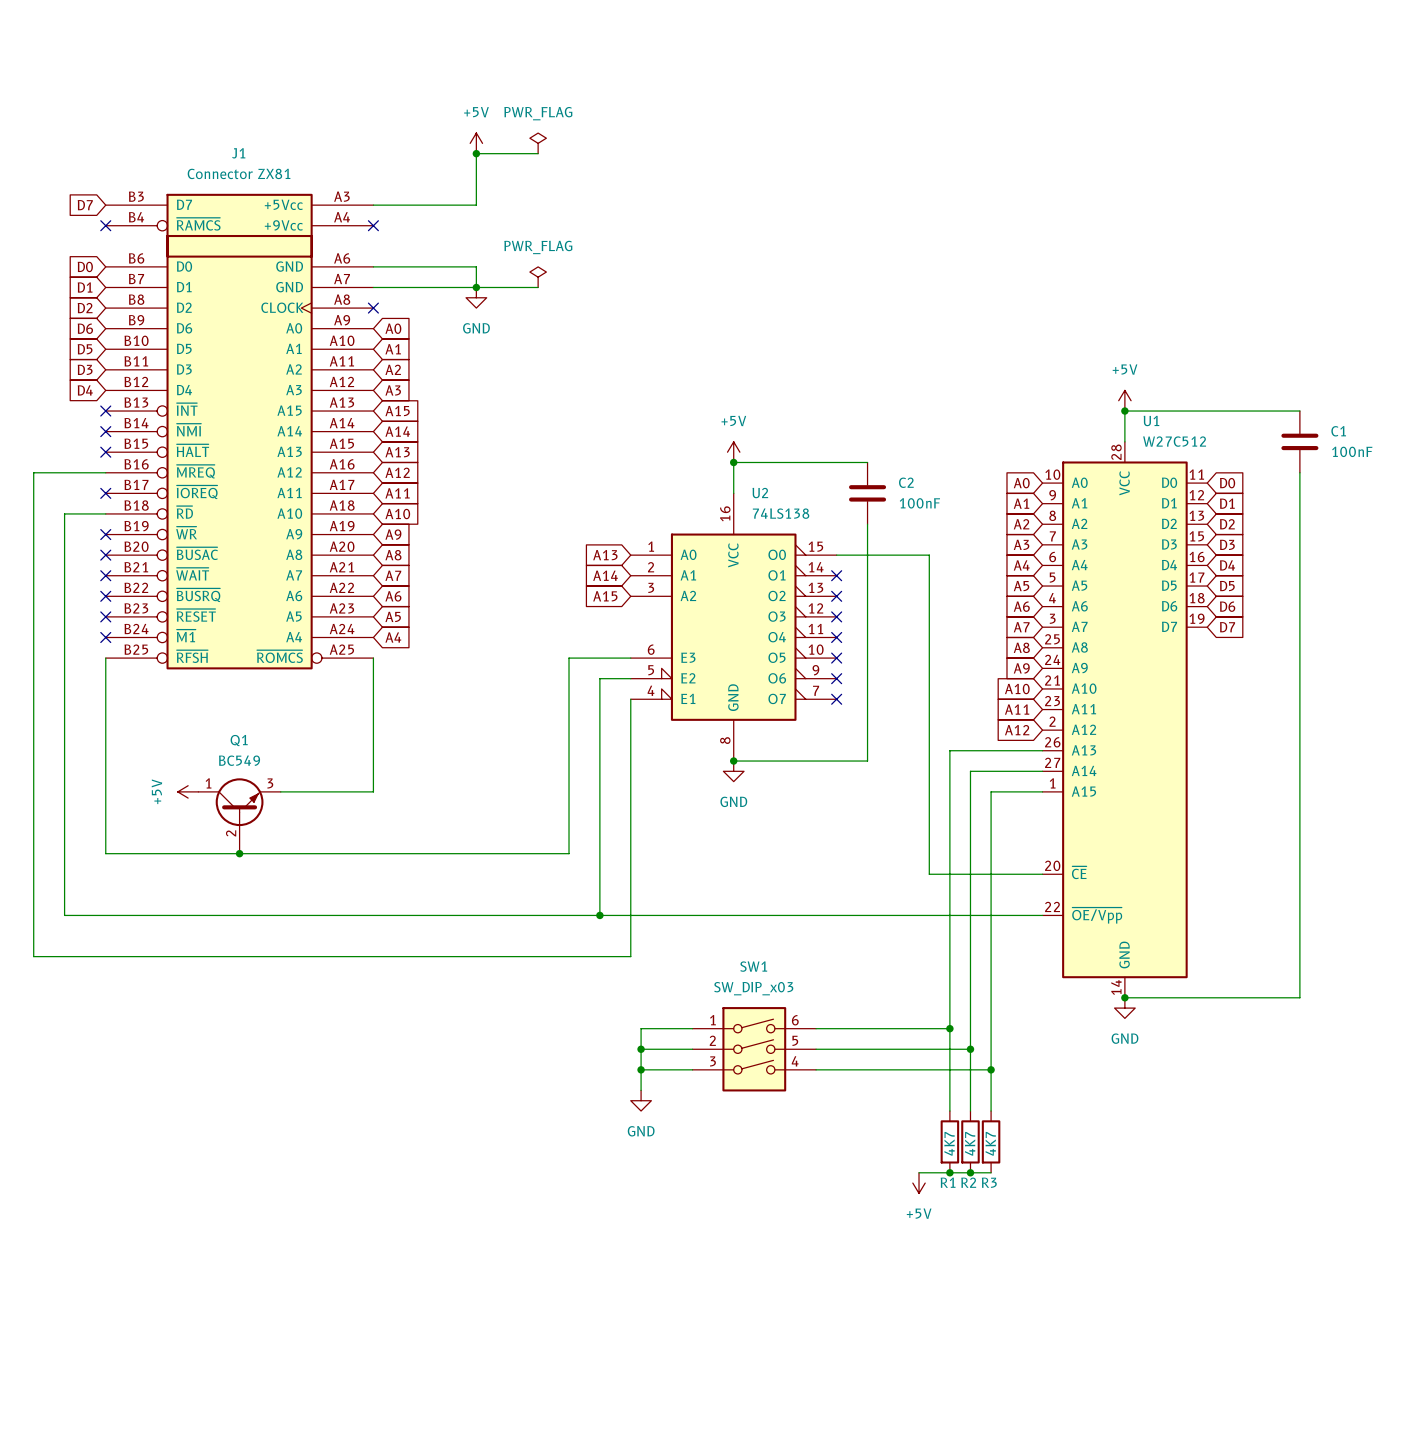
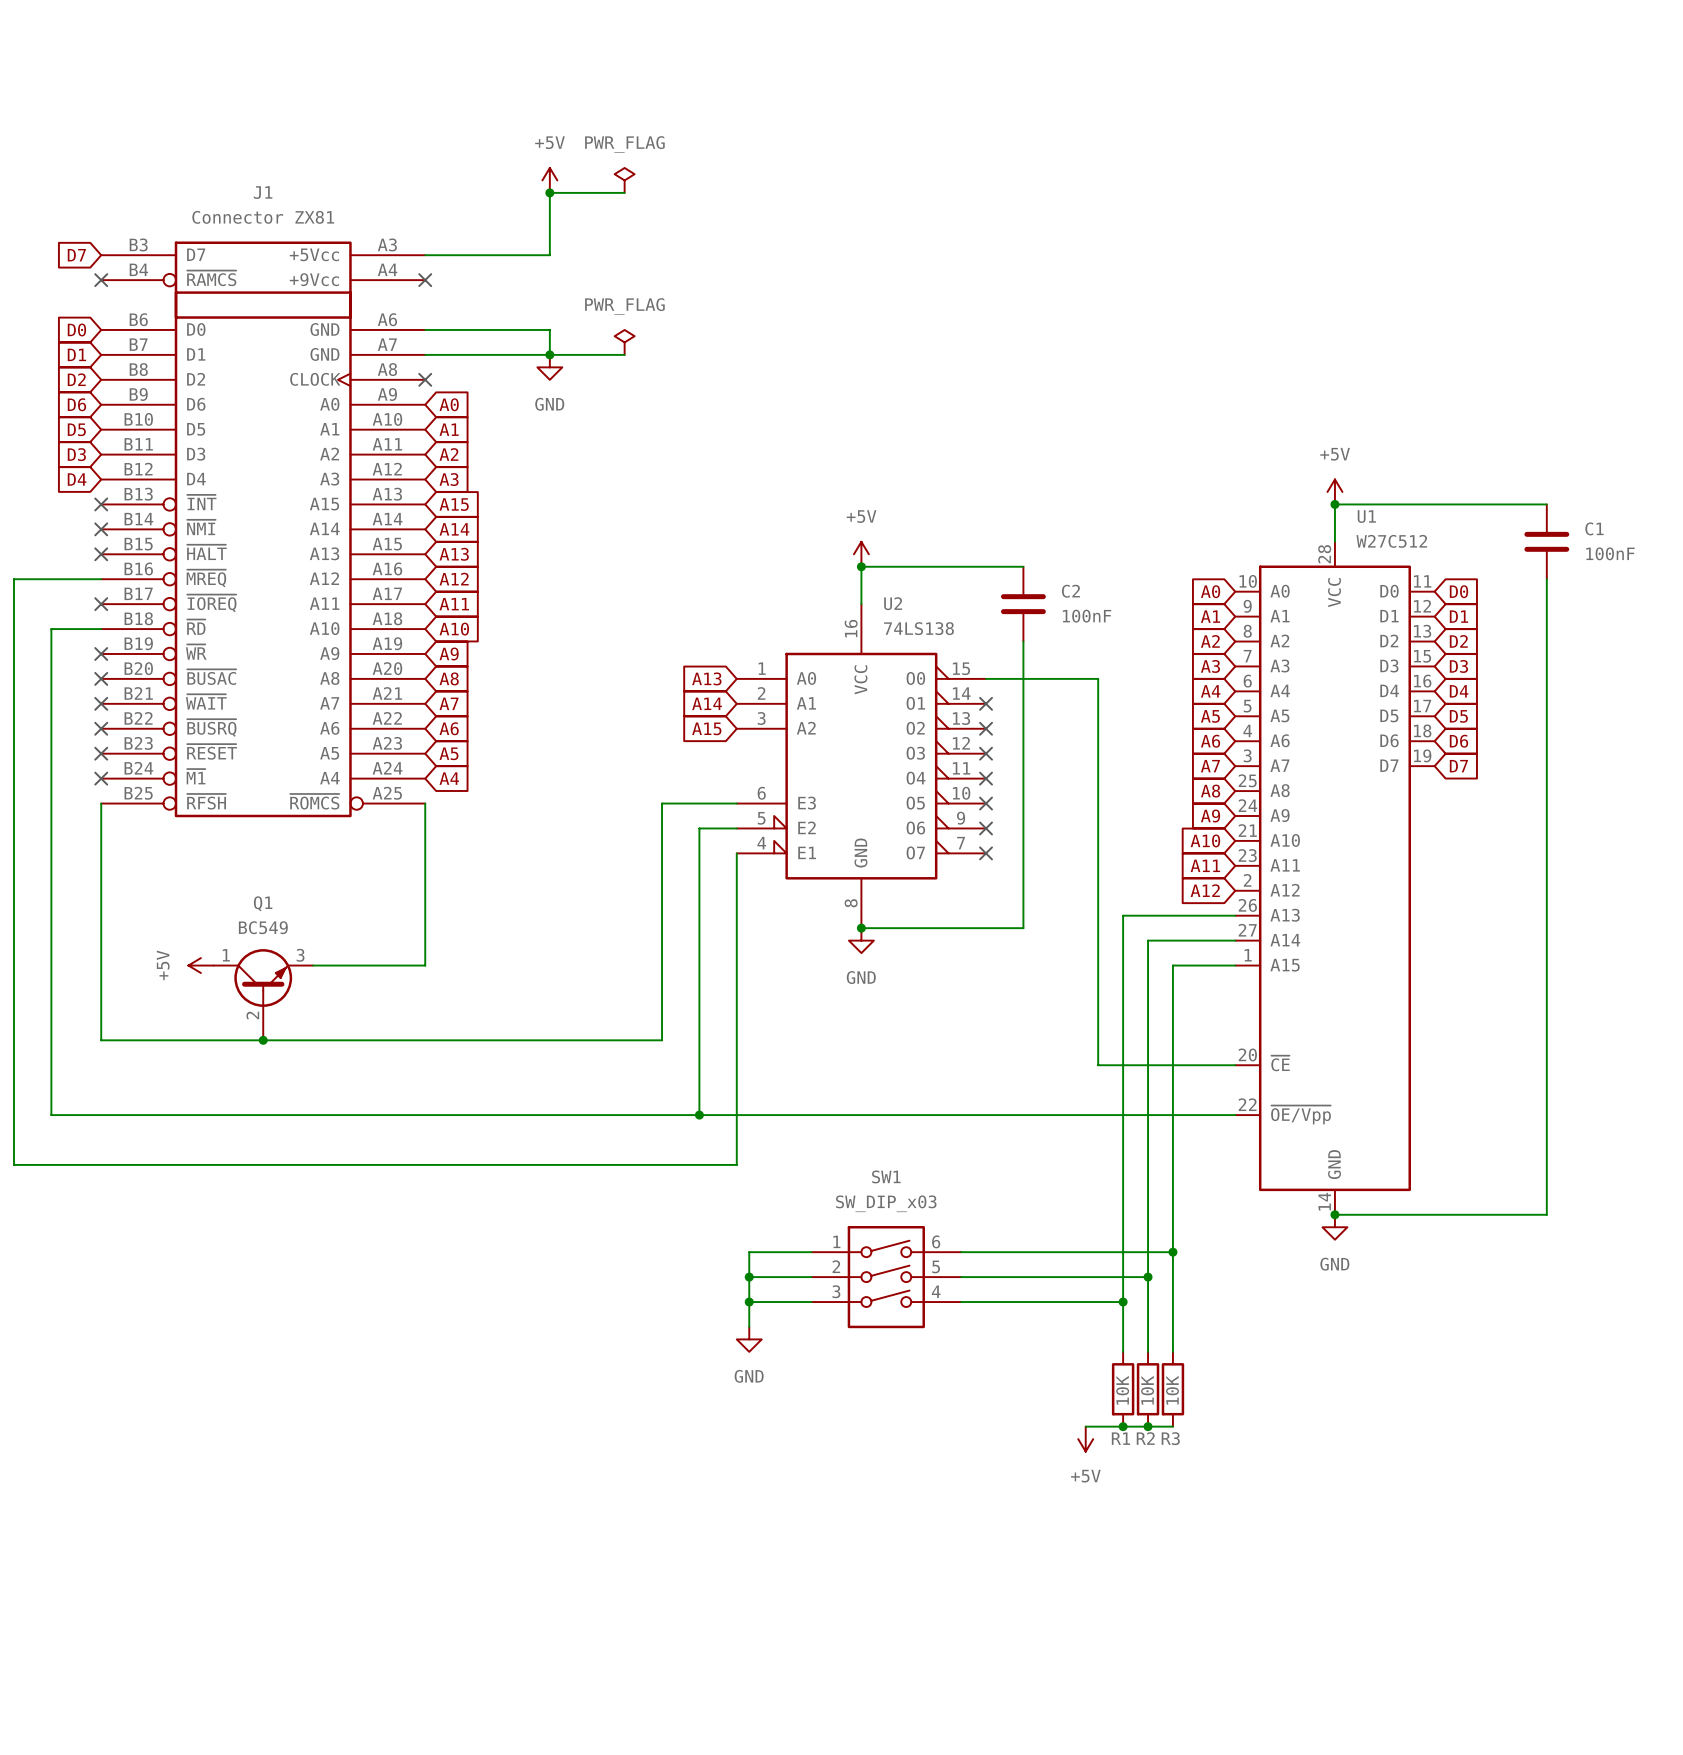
junction: (949, 1028) -> none
junction: none -> (1172, 1252)
wire: (949, 1069) (991, 1069) -> (1123, 1252) (1172, 1252)
junction: none -> (1123, 1302)
junction: (991, 1069) -> none
R1 value: 4K7 (949, 1143) -> 10K (1122, 1390)
R2 value: 4K7 (970, 1143) -> 10K (1147, 1390)
R3 value: 4K7 (990, 1143) -> 10K (1172, 1390)

